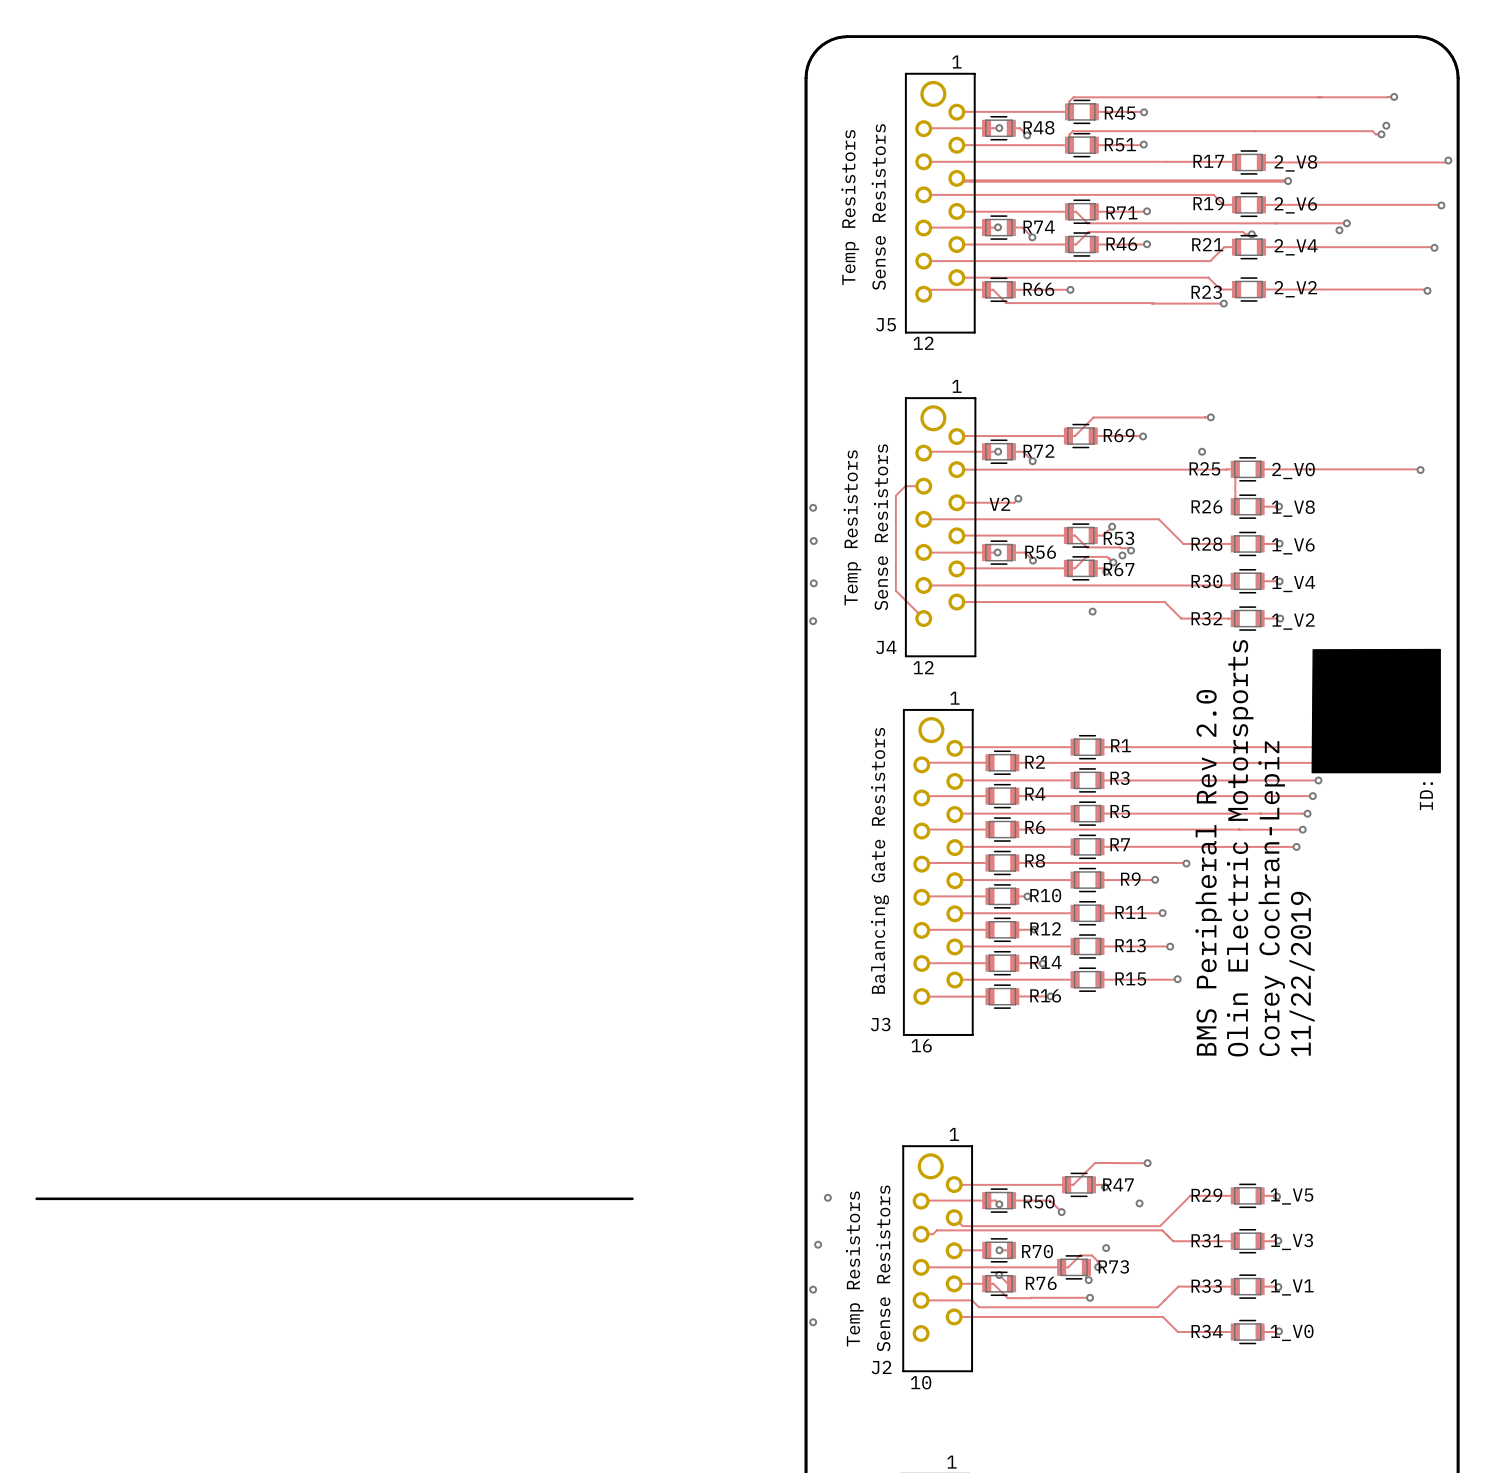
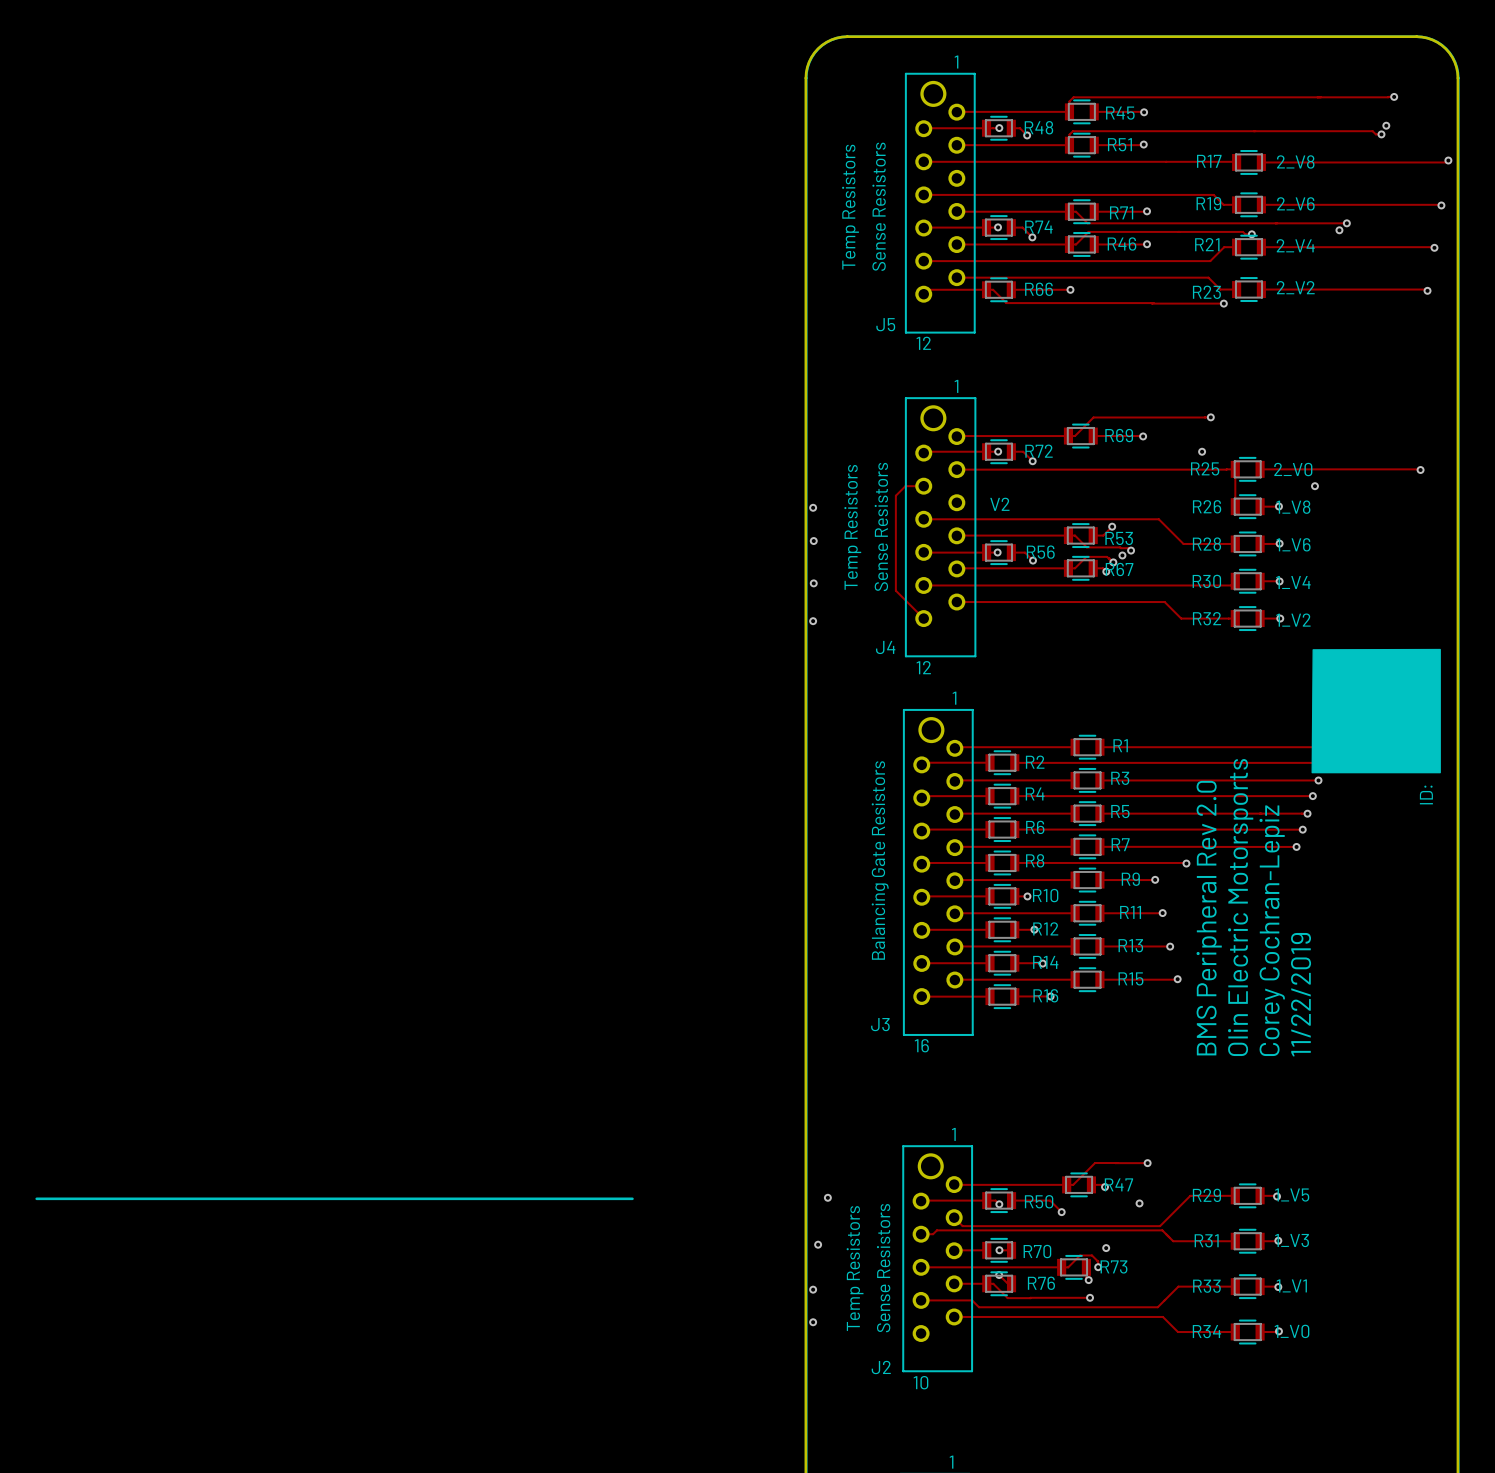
track: (956, 178) (959, 181) (1288, 181) -> none
via: (1288, 181) -> none
via: none -> (1314, 486)
track: (1018, 498) (1014, 502) (956, 502) -> none
via: (1018, 498) -> none
via: (1092, 611) -> none

